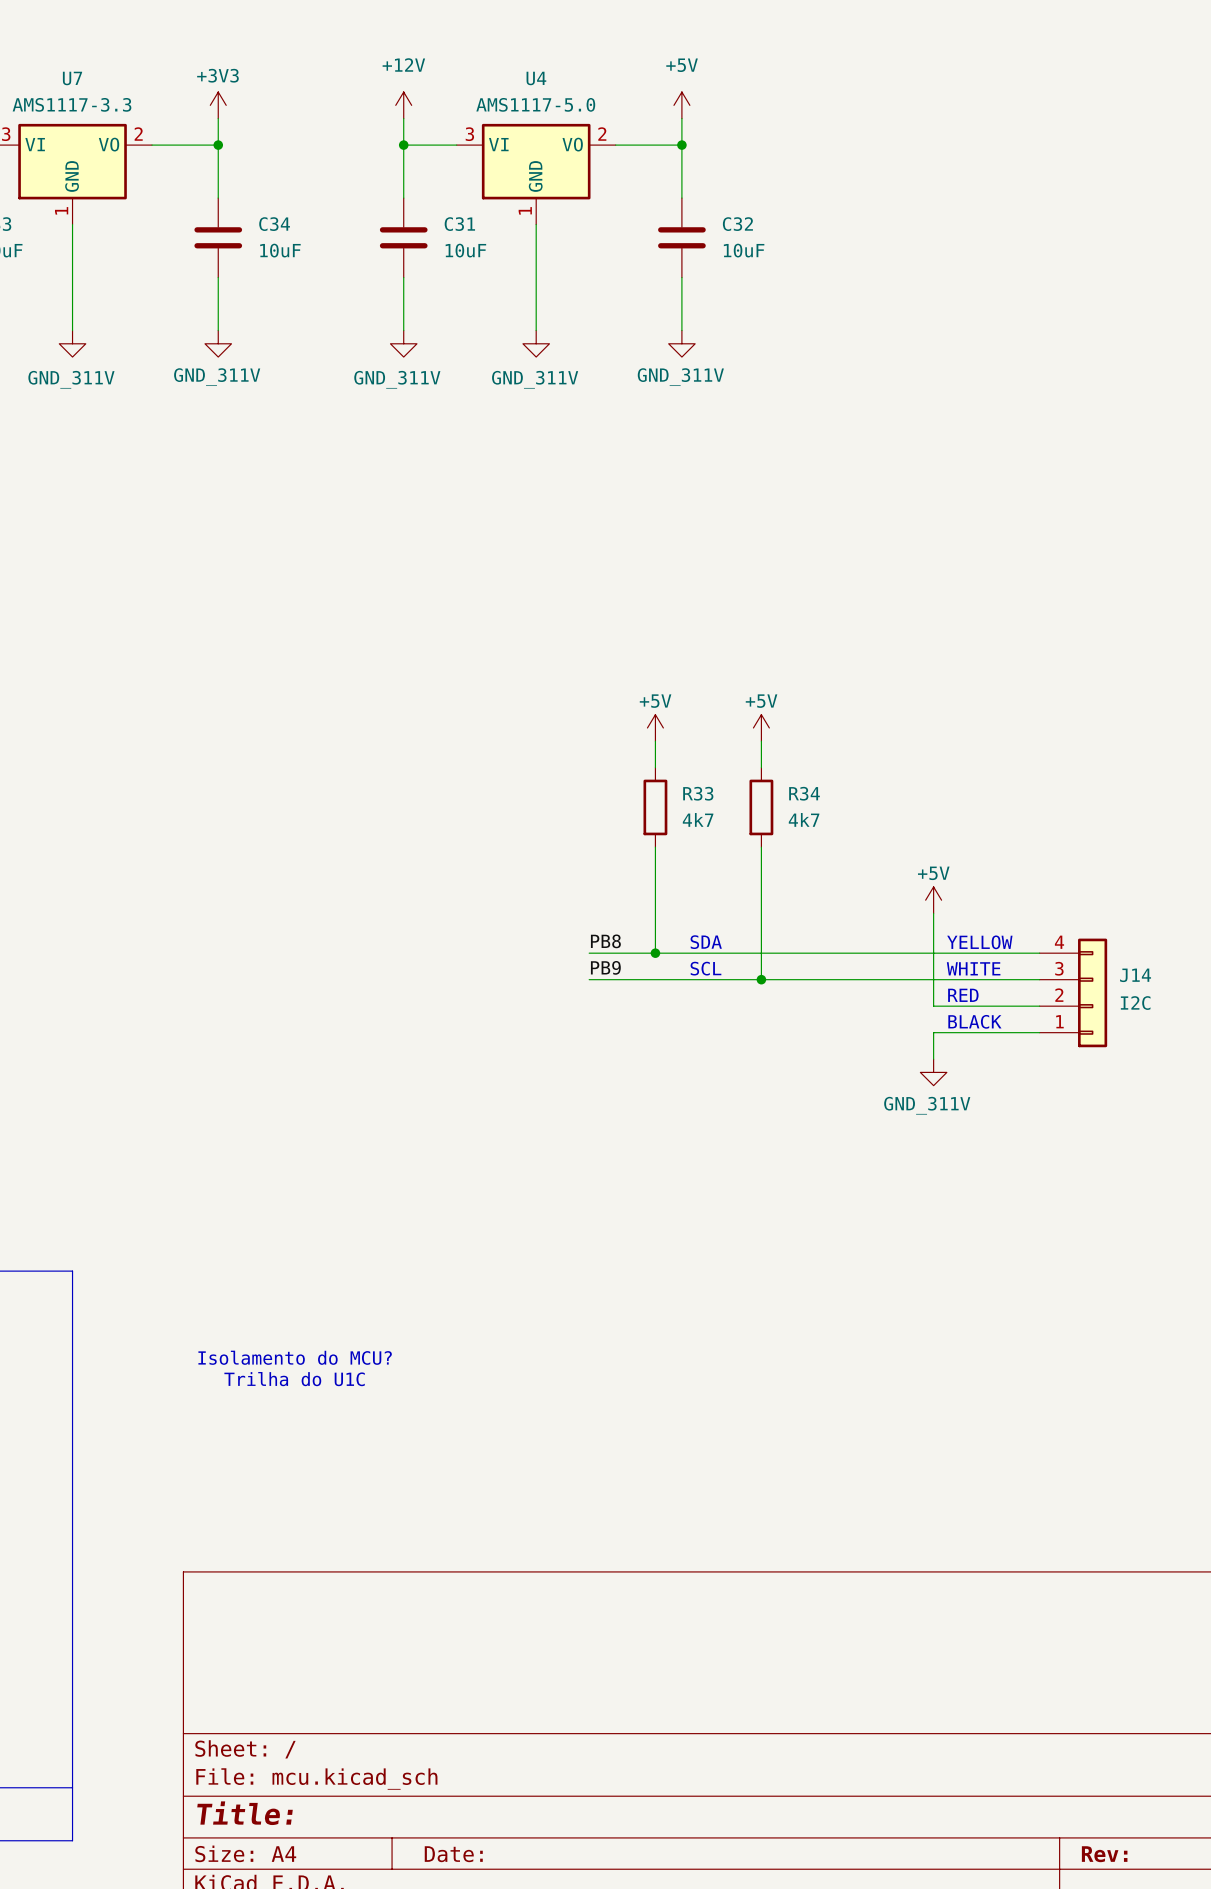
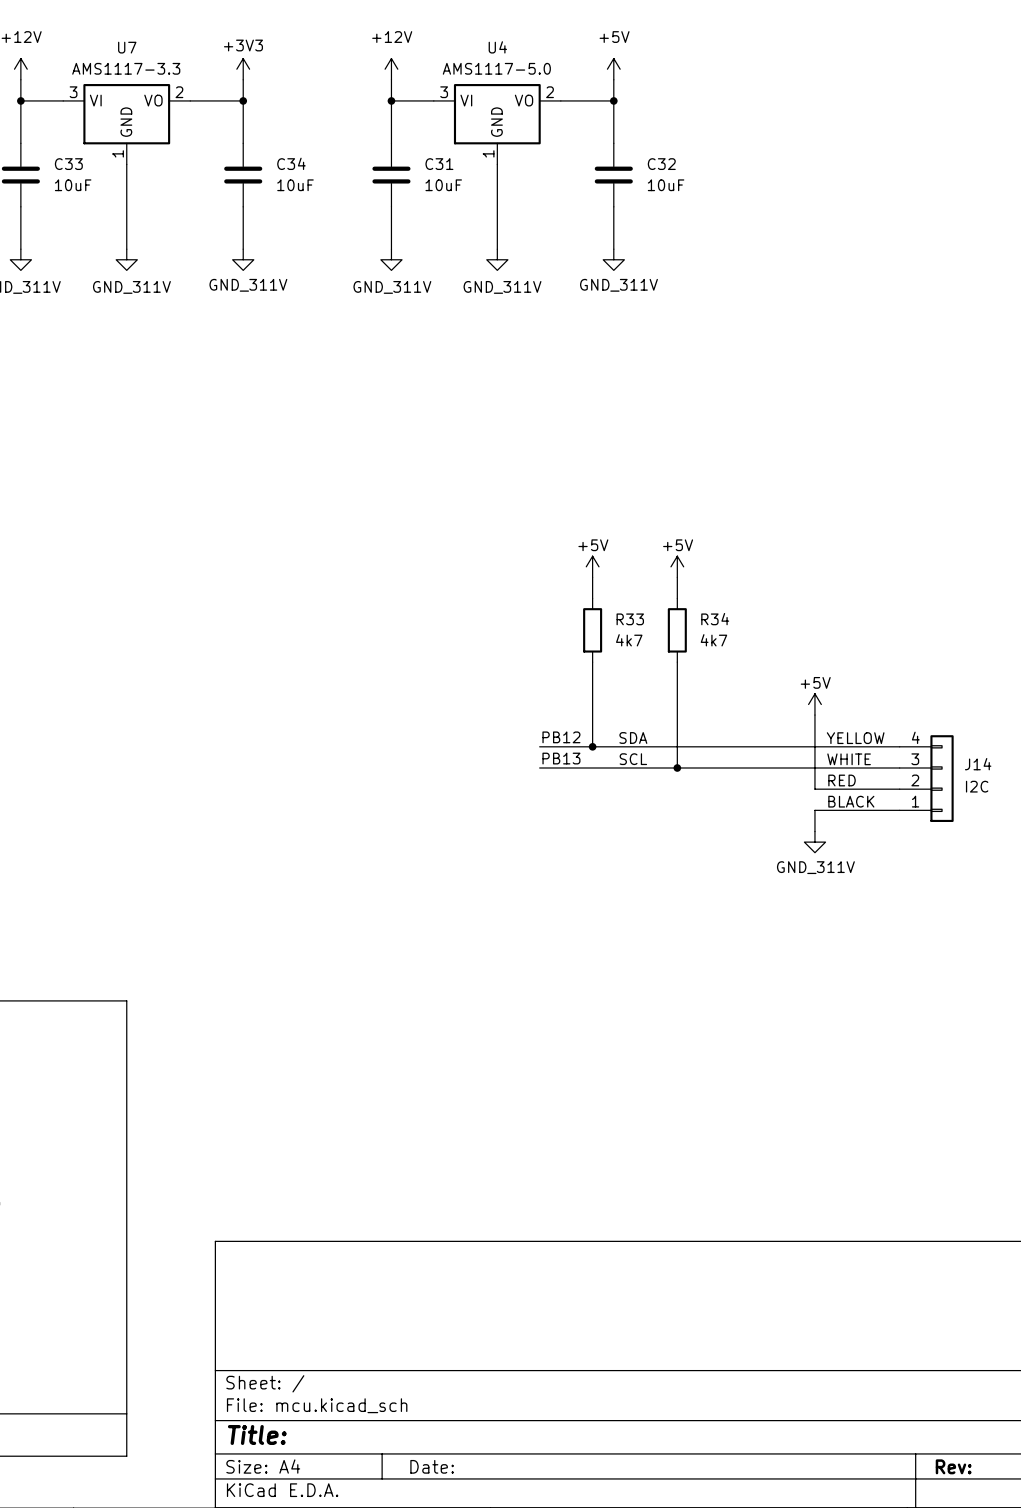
label: PB8 (605, 941) -> PB12 (561, 737)
label: PB9 (605, 967) -> PB13 (561, 758)
text: Isolamento do MCU? (295, 1357) -> none
text: Trilha do U1C (294, 1379) -> none

